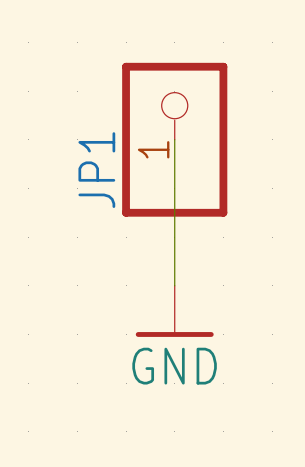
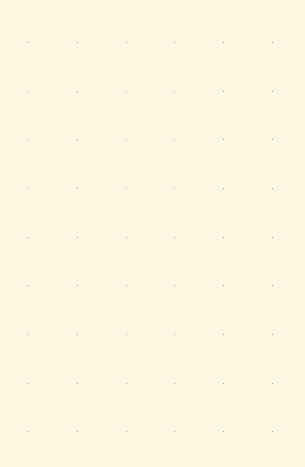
wire: (174, 139) (174, 285) -> none
JP1: (174, 139) -> none
power symbol: GND (174, 311) -> none

